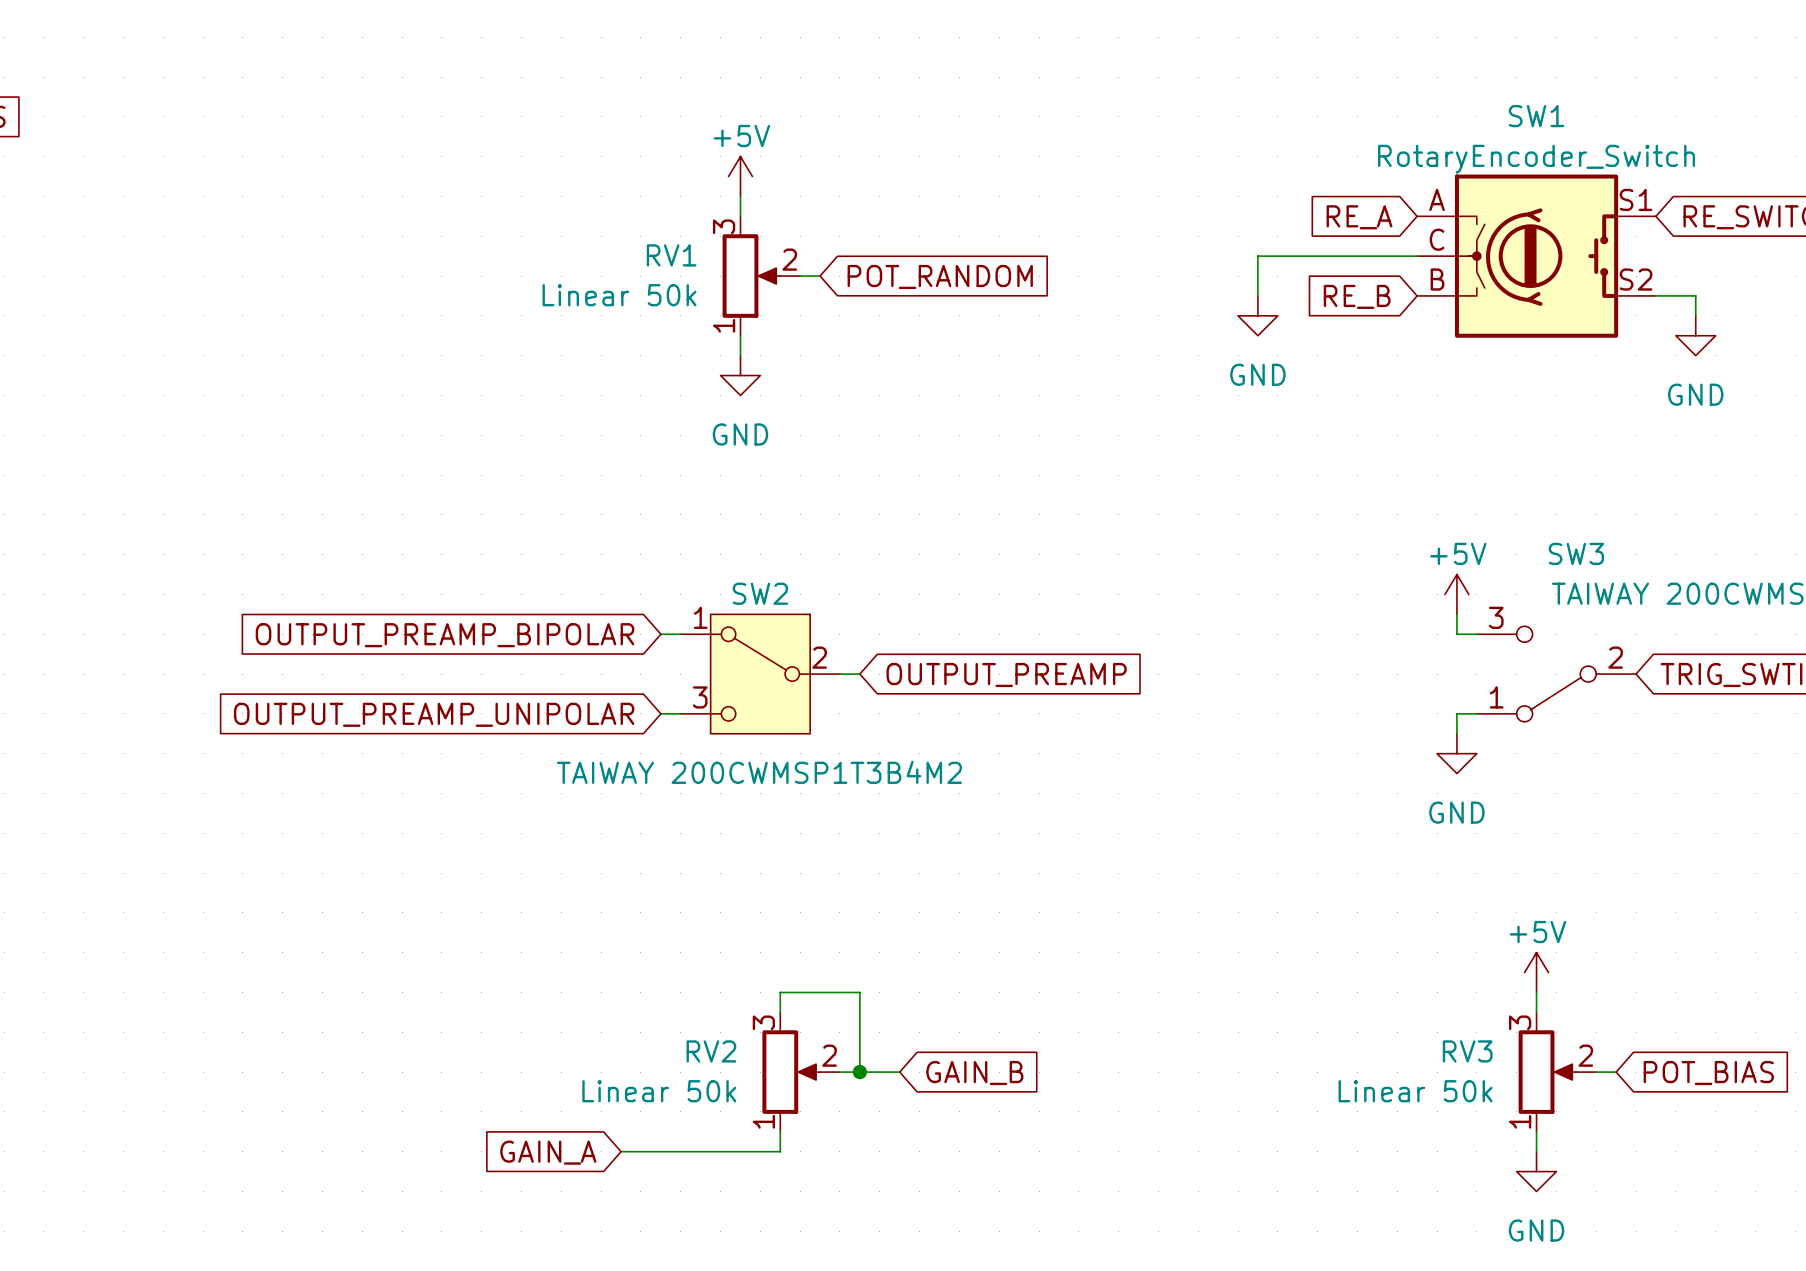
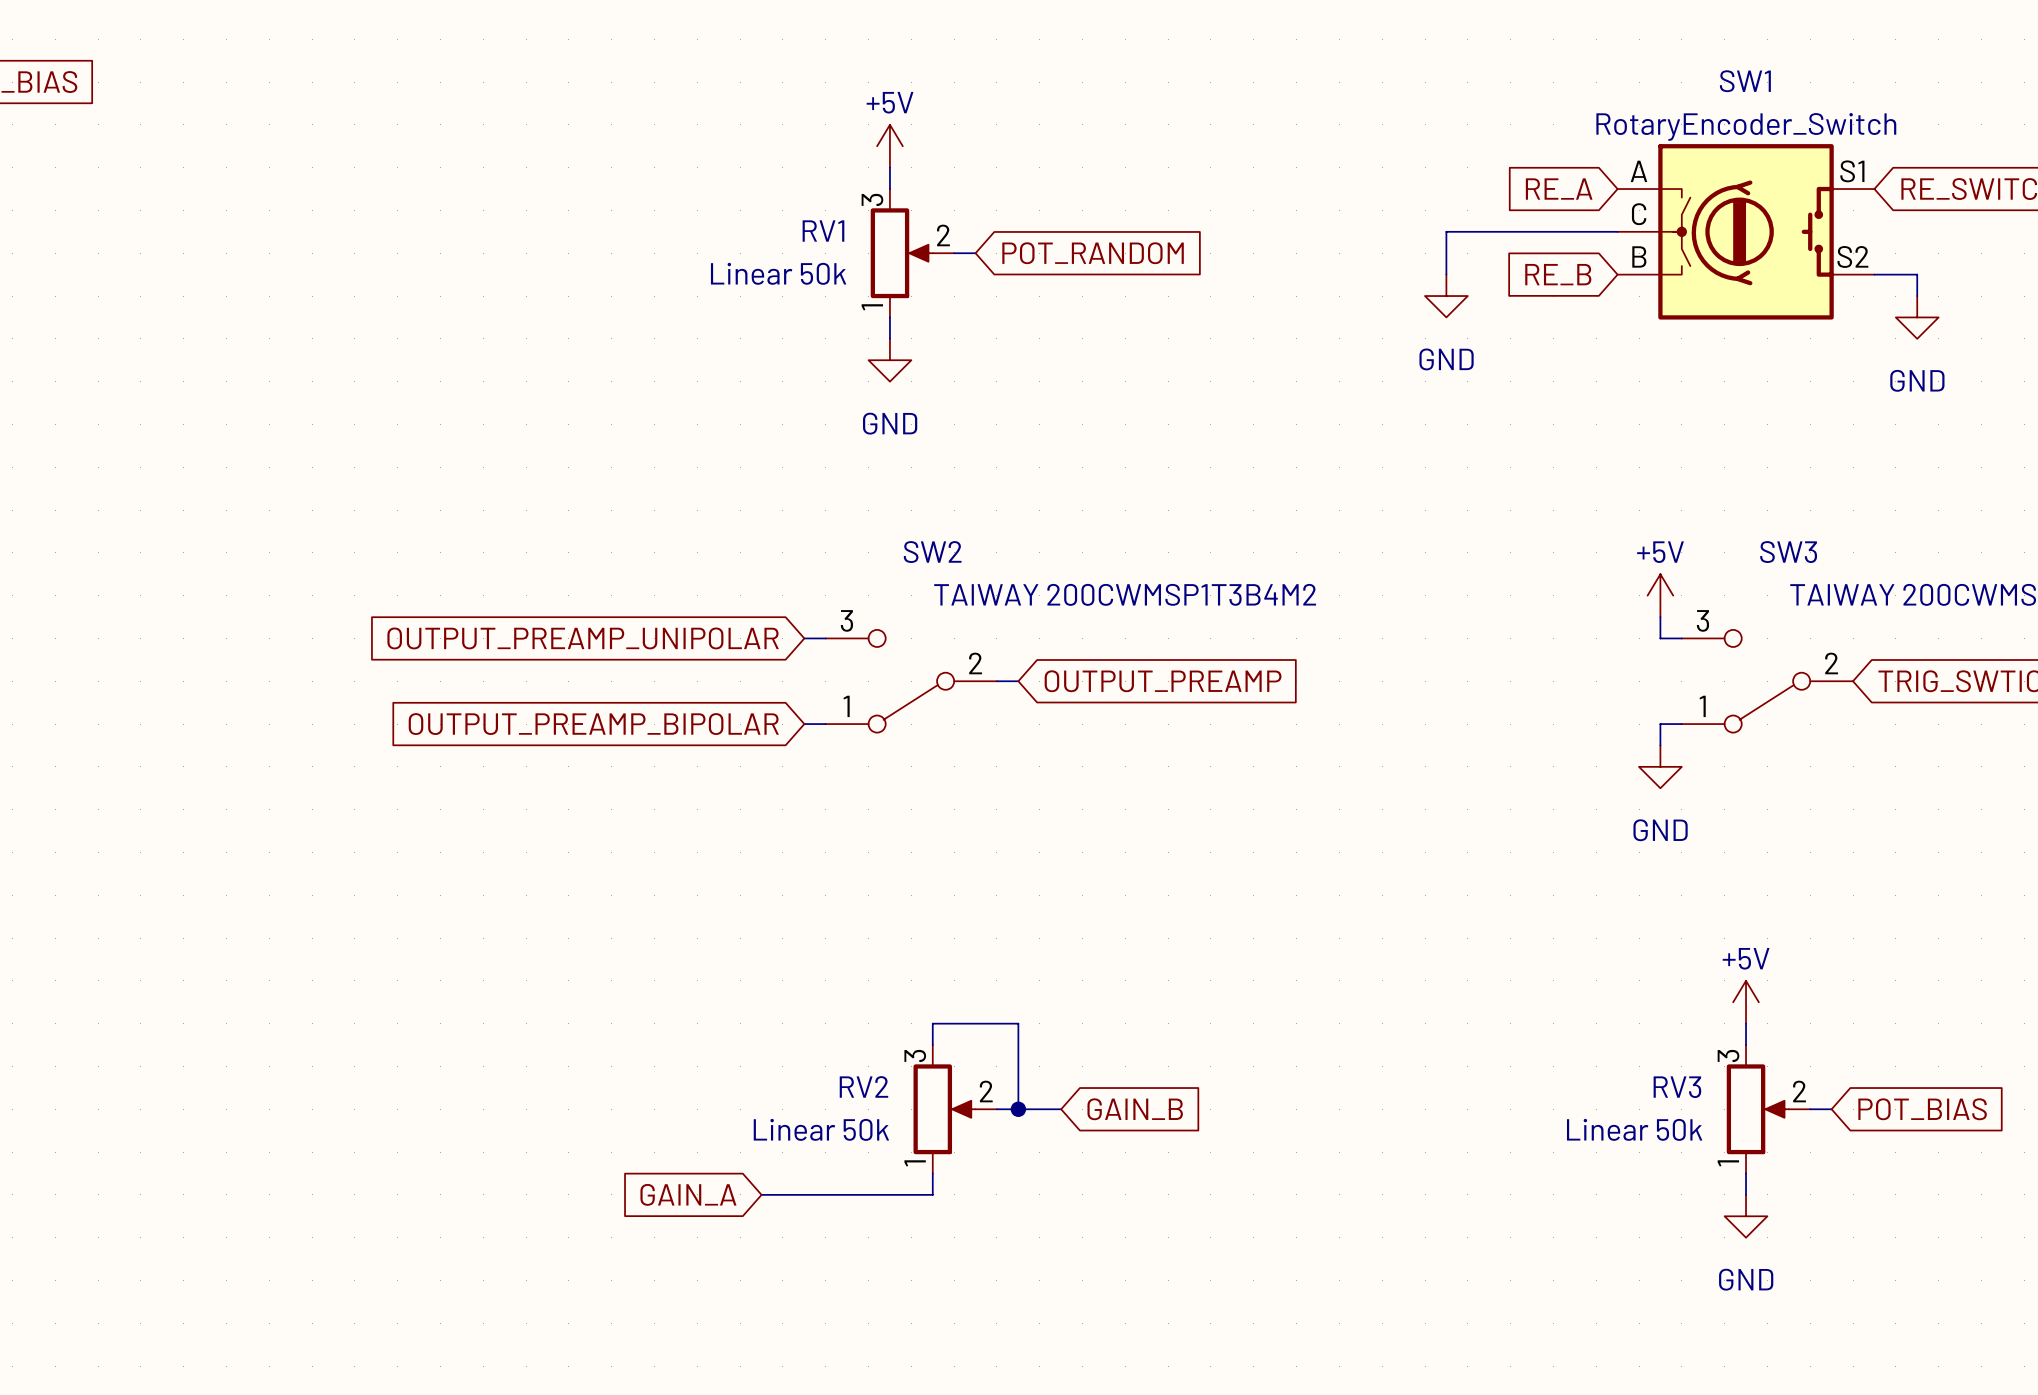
SW2 name position: SW2 (760, 593) -> SW2 (932, 552)
SW2 symbol: [680, 614, 840, 734] -> [825, 629, 997, 733]
global label: OUTPUT_PREAMP_BIPOLAR (445, 635) -> OUTPUT_PREAMP_UNIPOLAR (583, 638)
global label: OUTPUT_PREAMP_UNIPOLAR (434, 714) -> OUTPUT_PREAMP_BIPOLAR (593, 724)
SW2 value position: TAIWAY 200CWMSP1T3B4M2 (759, 772) -> TAIWAY 200CWMSP1T3B4M2 (1125, 594)

